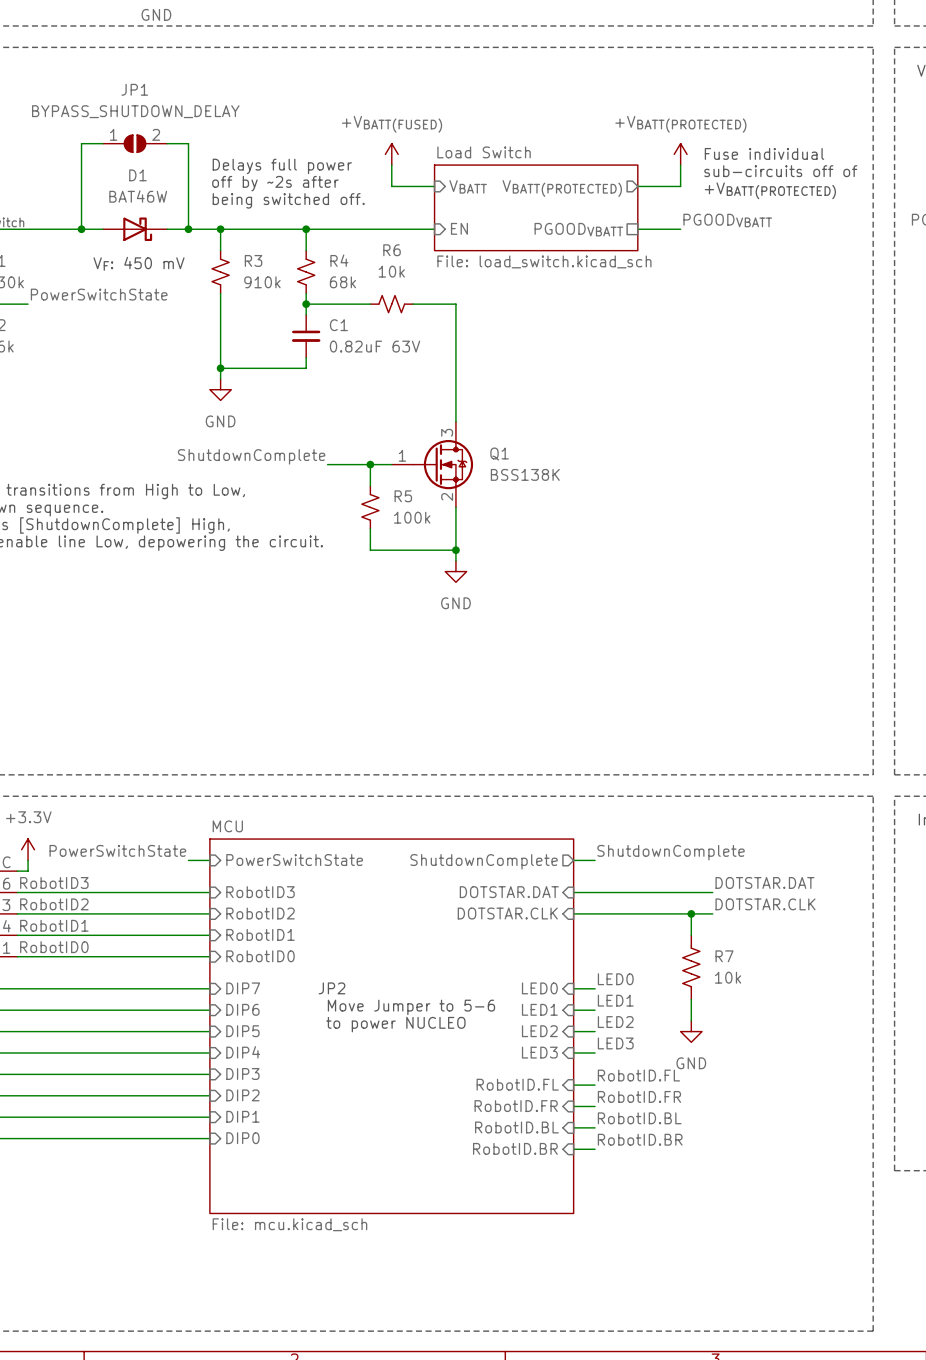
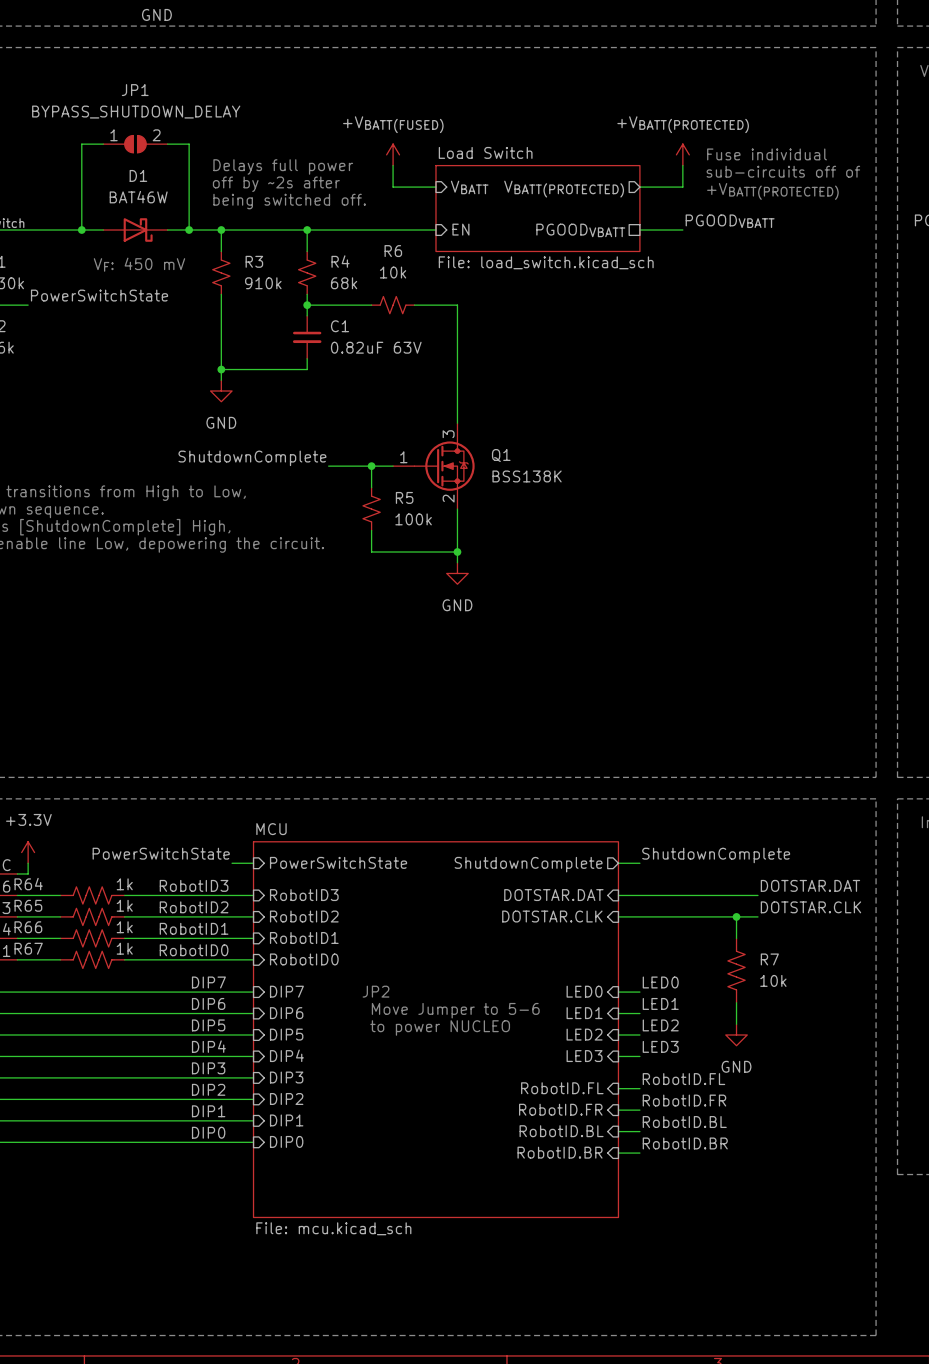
label position: PowerSwitchState (117, 850) -> PowerSwitchState (161, 853)
label position: ShutdownComplete (671, 852) -> ShutdownComplete (716, 855)
wire: (188, 860) (209, 860) -> (232, 863) (253, 863)
sheet pin position: PowerSwitchState (294, 860) -> PowerSwitchState (338, 862)
wire: (573, 860) (595, 860) -> (618, 863) (639, 863)
sheet pin position: ShutdownComplete (484, 861) -> ShutdownComplete (528, 864)
label position: RobotID3 (54, 882) -> RobotID3 (194, 885)
label position: DOTSTAR.DAT (765, 882) -> DOTSTAR.DAT (810, 885)
R64: none -> 1k (92, 895)
wire: none -> (210, 895) (253, 895)
sheet pin position: RobotID3 (260, 892) -> RobotID3 (304, 895)
sheet pin position: DOTSTAR.DAT (509, 892) -> DOTSTAR.DAT (553, 895)
wire: (573, 892) (616, 892) -> (715, 895) (757, 895)
label position: RobotID2 (54, 904) -> RobotID2 (194, 907)
label position: DOTSTAR.CLK (765, 904) -> DOTSTAR.CLK (810, 907)
R65: none -> 1k (92, 916)
wire: none -> (210, 916) (253, 916)
sheet pin position: RobotID2 (260, 913) -> RobotID2 (304, 916)
sheet pin position: DOTSTAR.CLK (507, 913) -> DOTSTAR.CLK (552, 916)
wire: (573, 913) (616, 913) -> (715, 916) (757, 916)
wire: (691, 913) (691, 935) -> (736, 916) (736, 938)
junction position: (691, 913) -> (736, 916)
label position: RobotID1 (54, 925) -> RobotID1 (194, 928)
sheet pin position: RobotID1 (260, 934) -> RobotID1 (304, 937)
R66: none -> 1k (92, 938)
wire: none -> (210, 938) (253, 938)
label position: RobotID0 (54, 947) -> RobotID0 (194, 950)
R67: none -> 1k (92, 959)
wire: none -> (210, 959) (253, 959)
sheet pin position: RobotID0 (260, 956) -> RobotID0 (304, 959)
R7 position: (691, 967) -> (736, 970)
label: none -> DIP7 (208, 982)
label position: LED0 (615, 979) -> LED0 (660, 982)
wire: none -> (210, 992) (253, 992)
sheet pin position: DIP7 (243, 988) -> DIP7 (286, 991)
text position: JP2 (331, 988) -> JP2 (376, 991)
sheet pin position: LED0 (539, 988) -> LED0 (584, 991)
wire: (573, 988) (595, 988) -> (618, 992) (639, 992)
wire: (691, 999) (691, 1020) -> (736, 1002) (736, 1024)
label: none -> DIP6 (208, 1003)
label position: LED1 (615, 1000) -> LED1 (660, 1003)
text position: Move Jumper to 5-6 (411, 1007) -> Move Jumper to 5-6 (455, 1010)
sheet pin position: DIP6 (242, 1009) -> DIP6 (286, 1013)
sheet pin position: LED1 (539, 1009) -> LED1 (584, 1013)
wire: none -> (210, 1013) (253, 1013)
wire: (573, 1010) (595, 1010) -> (618, 1013) (639, 1013)
label: none -> DIP5 (208, 1025)
label position: LED2 (615, 1022) -> LED2 (660, 1025)
text position: to power NUCLEO (395, 1024) -> to power NUCLEO (440, 1027)
sheet MCU position: (391, 1026) -> (435, 1029)
wire: none -> (210, 1034) (253, 1034)
sheet pin position: DIP5 (242, 1031) -> DIP5 (286, 1034)
sheet pin position: LED2 (539, 1031) -> LED2 (584, 1034)
wire: (573, 1031) (595, 1031) -> (618, 1034) (639, 1034)
power symbol position: GND (691, 1031) -> GND (736, 1034)
label: none -> DIP4 (208, 1046)
label position: LED3 (615, 1043) -> LED3 (660, 1046)
wire: none -> (210, 1056) (253, 1056)
sheet pin position: DIP4 (243, 1052) -> DIP4 (286, 1055)
sheet pin position: LED3 (539, 1052) -> LED3 (584, 1056)
wire: (573, 1052) (595, 1052) -> (618, 1056) (639, 1056)
label: none -> DIP3 (208, 1068)
sheet pin position: DIP3 (242, 1073) -> DIP3 (286, 1077)
wire: none -> (210, 1077) (253, 1077)
label position: RobotID.FL (638, 1075) -> RobotID.FL (683, 1079)
sheet pin position: RobotID.FL (517, 1084) -> RobotID.FL (562, 1088)
wire: (573, 1085) (595, 1085) -> (618, 1088) (639, 1088)
label: none -> DIP2 (208, 1089)
wire: none -> (210, 1099) (253, 1099)
sheet pin position: DIP2 (242, 1095) -> DIP2 (286, 1098)
label position: RobotID.FR (639, 1096) -> RobotID.FR (684, 1100)
sheet pin position: RobotID.FR (516, 1106) -> RobotID.FR (560, 1109)
wire: (573, 1106) (595, 1106) -> (618, 1110) (639, 1110)
label: none -> DIP1 (208, 1111)
sheet pin position: DIP1 (242, 1116) -> DIP1 (286, 1120)
wire: none -> (210, 1120) (253, 1120)
label position: RobotID.BL (639, 1118) -> RobotID.BL (684, 1122)
sheet pin position: RobotID.BL (516, 1127) -> RobotID.BL (561, 1131)
wire: (573, 1127) (595, 1127) -> (618, 1131) (639, 1131)
label: none -> DIP0 (208, 1132)
wire: none -> (210, 1142) (253, 1142)
sheet pin position: DIP0 (242, 1138) -> DIP0 (286, 1141)
label position: RobotID.BR (640, 1139) -> RobotID.BR (685, 1143)
sheet pin position: RobotID.BR (515, 1148) -> RobotID.BR (560, 1152)
wire: (573, 1149) (595, 1149) -> (618, 1153) (639, 1153)

